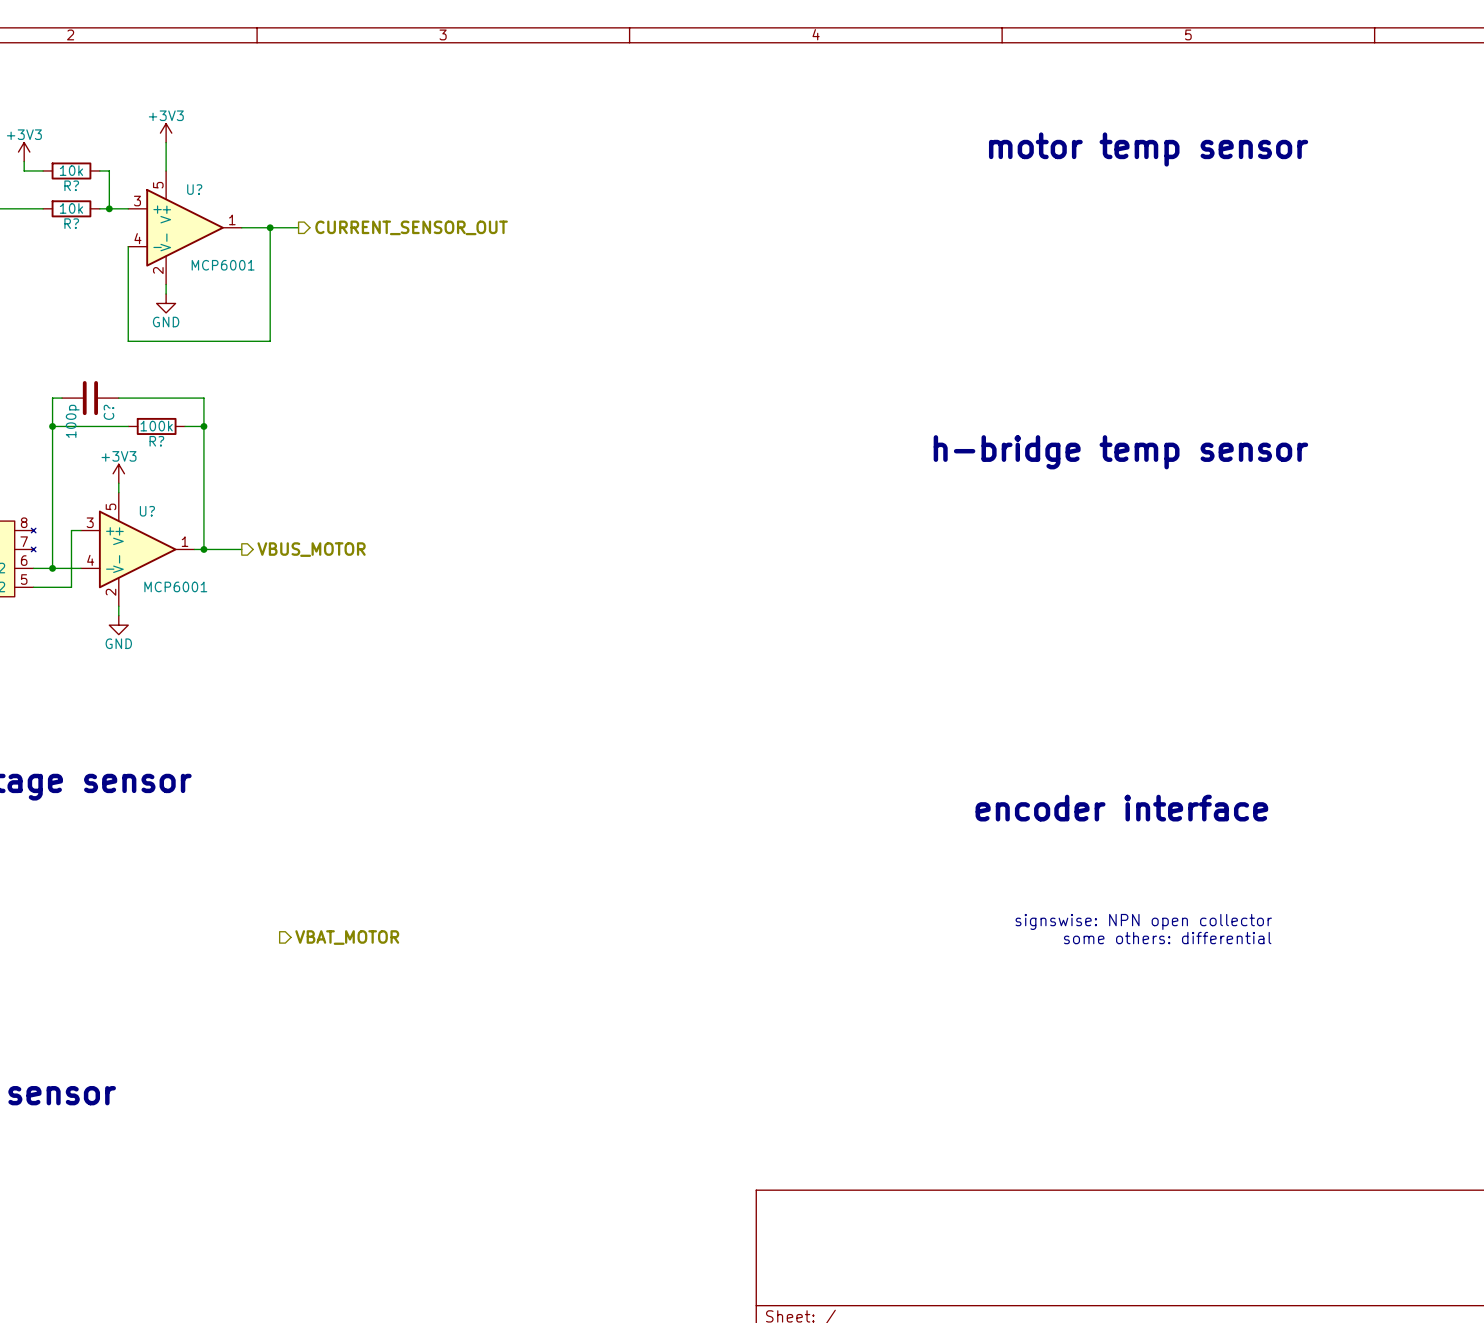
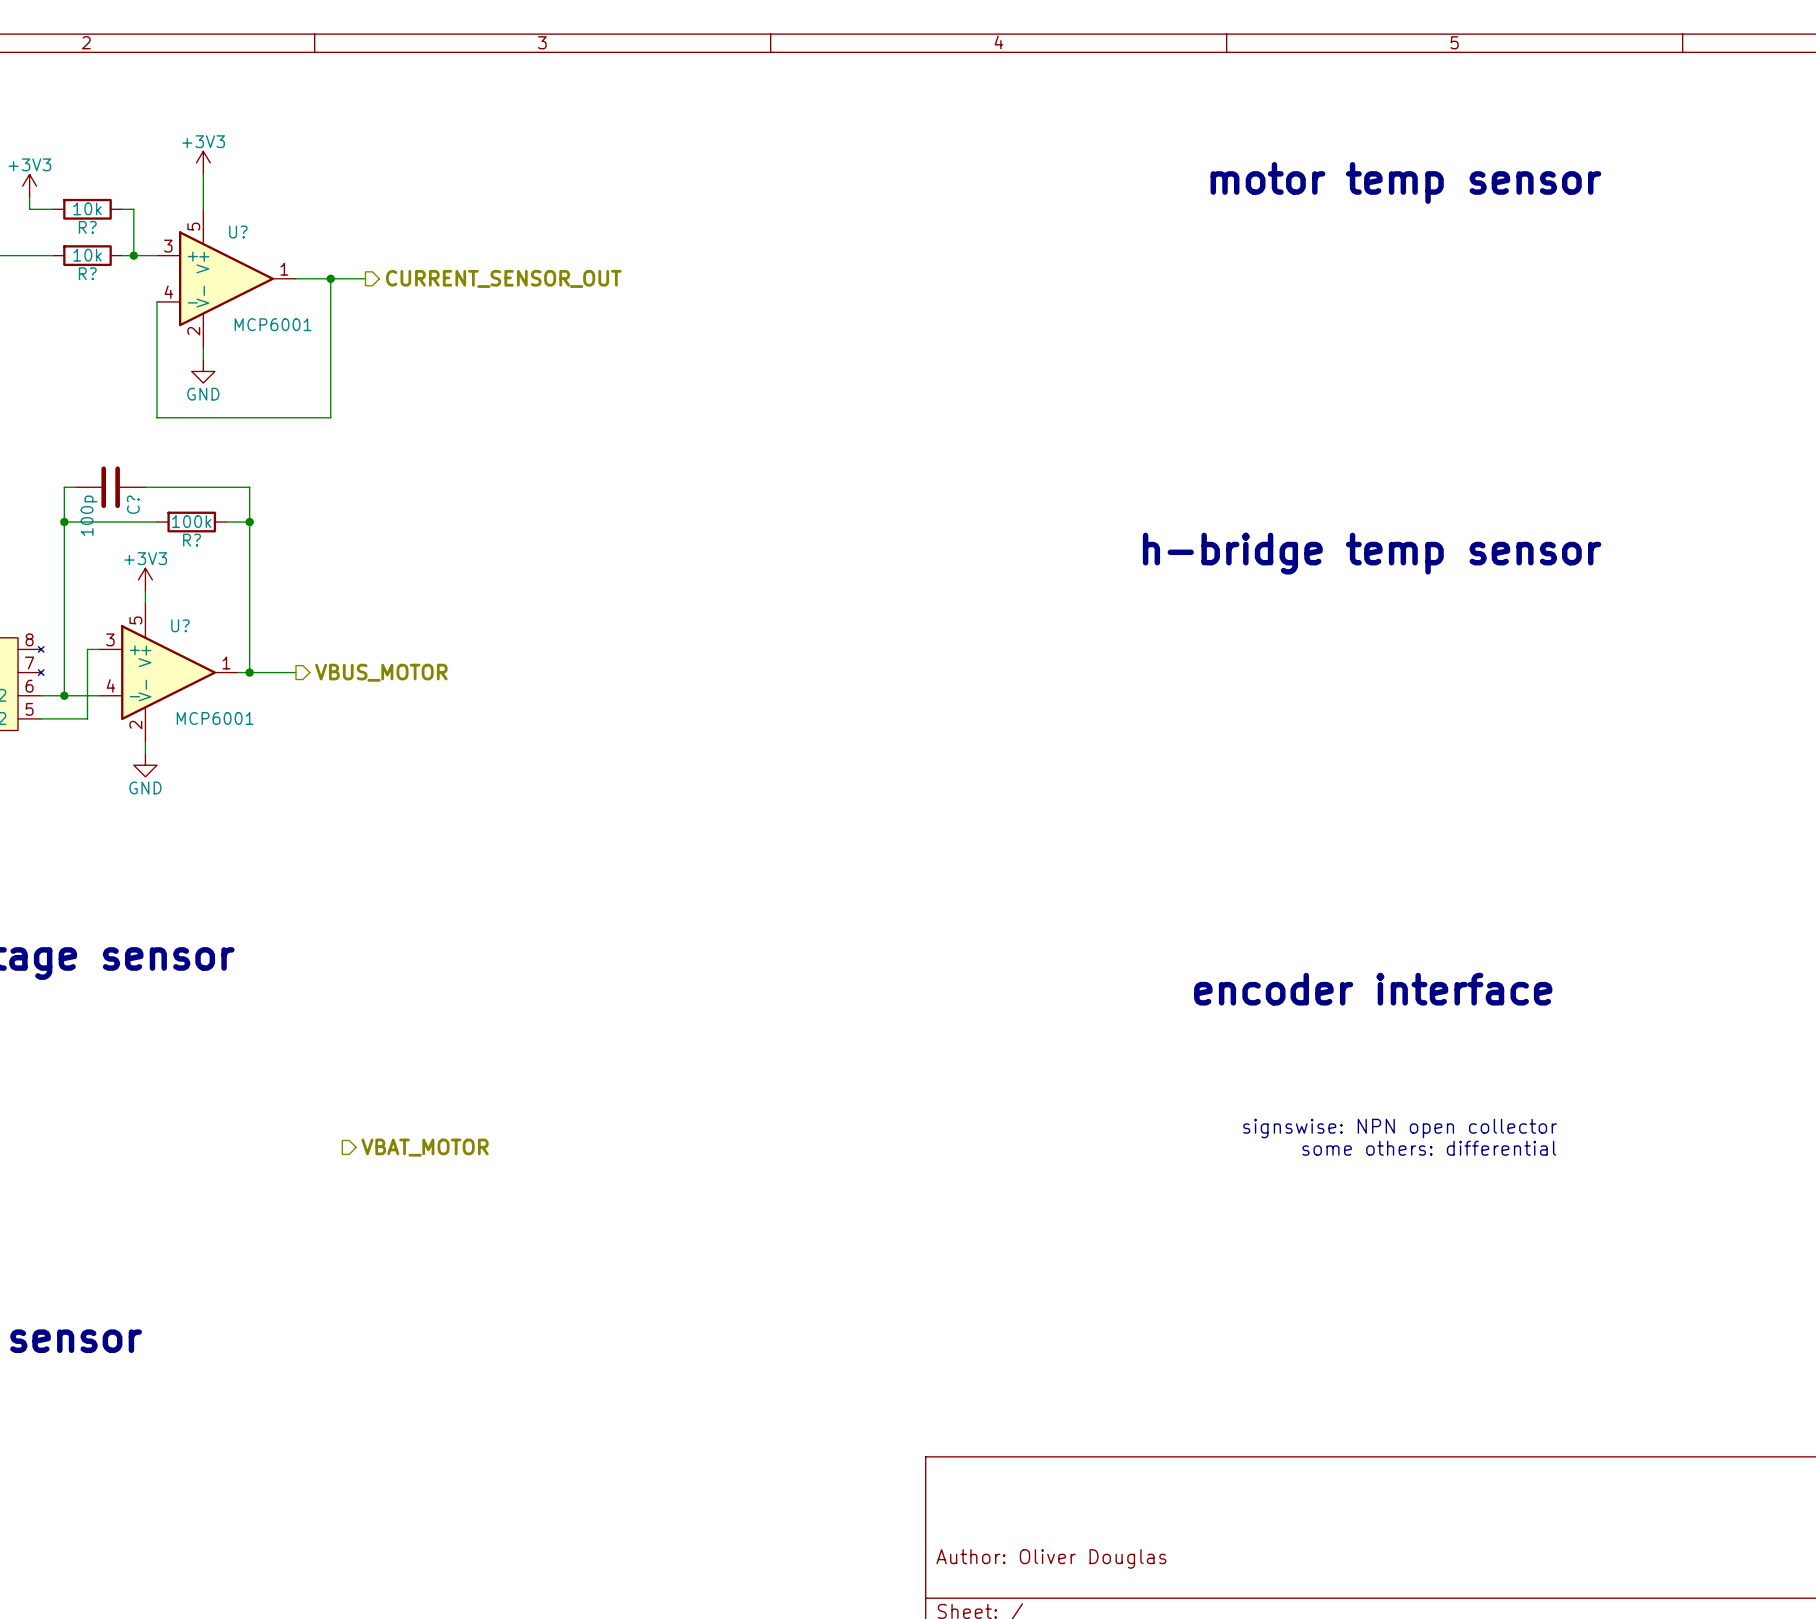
title block: none -> Author: Oliver Douglas (1051, 1558)

